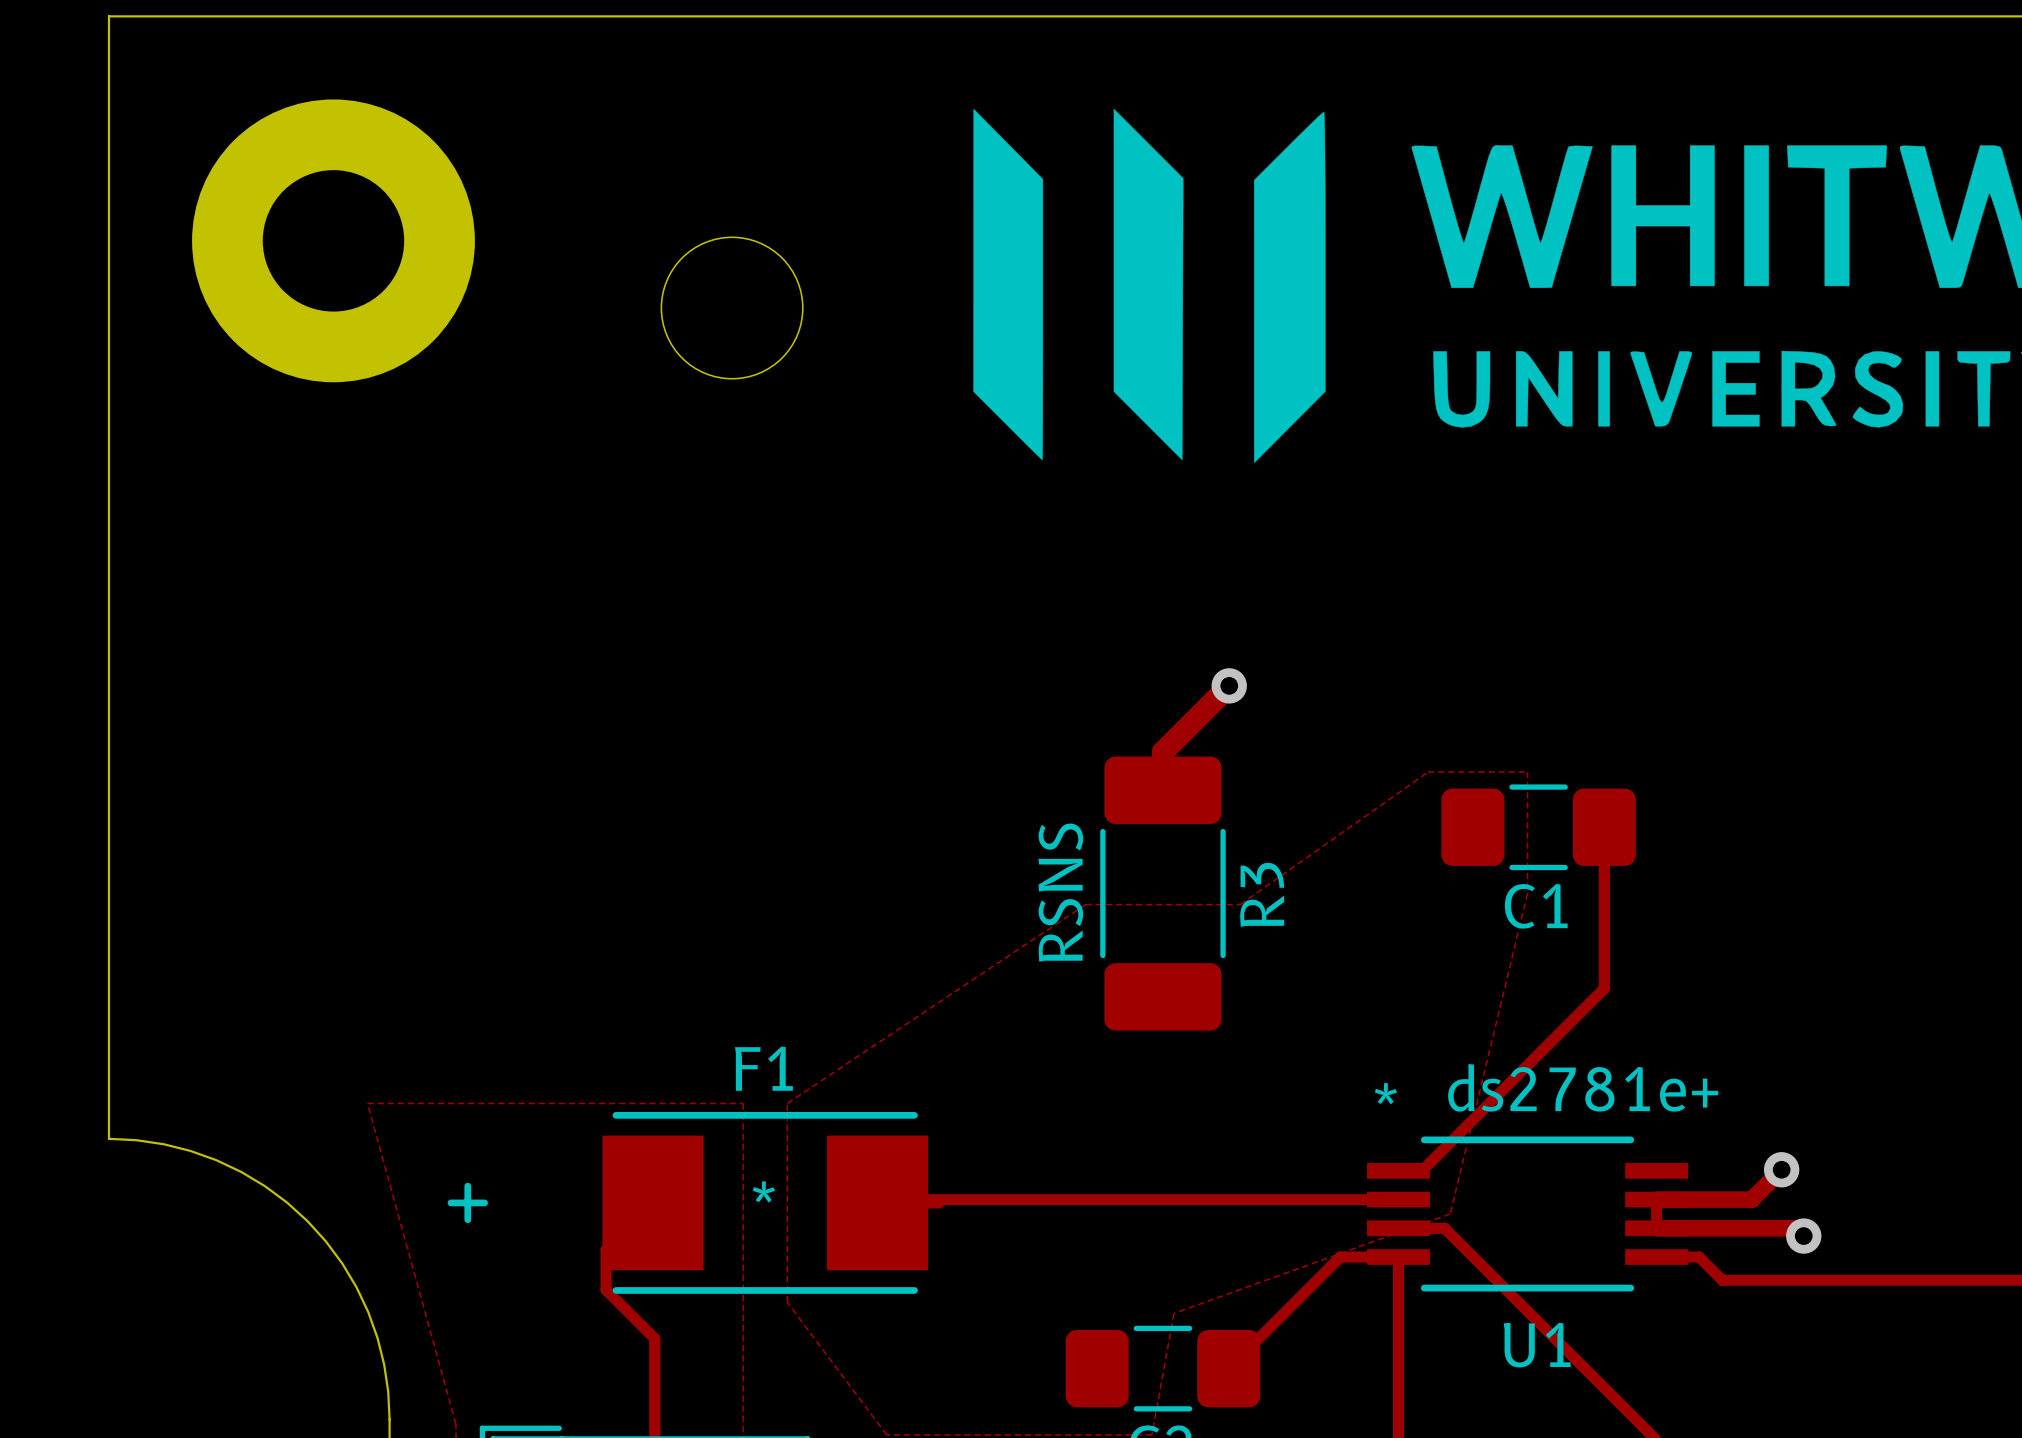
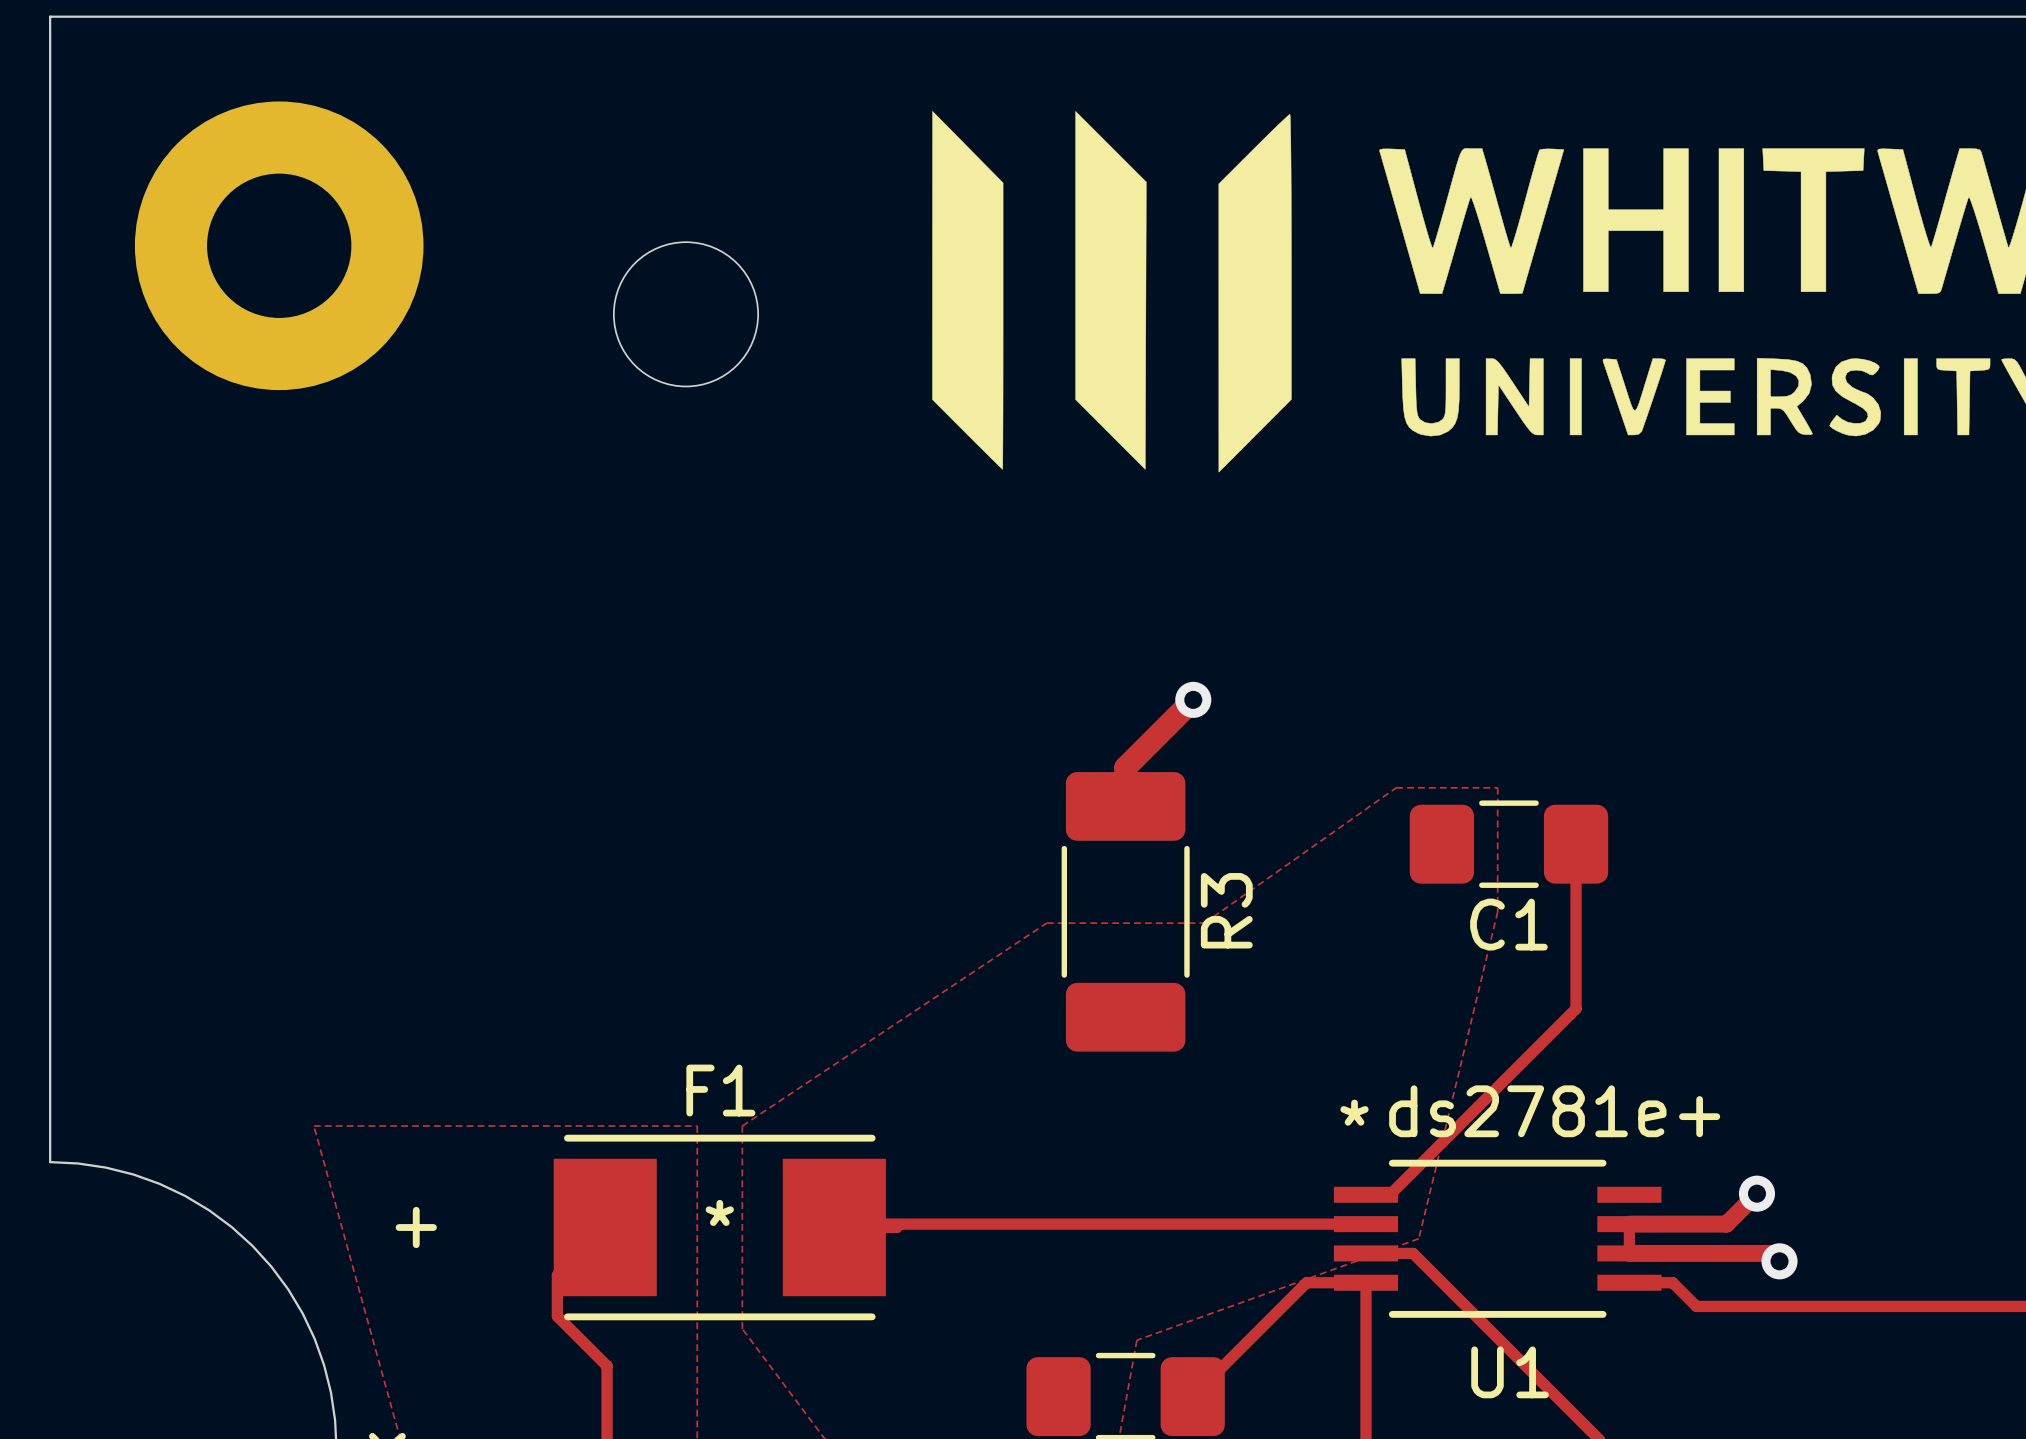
R3 value: RSNS (1060, 892) -> none

